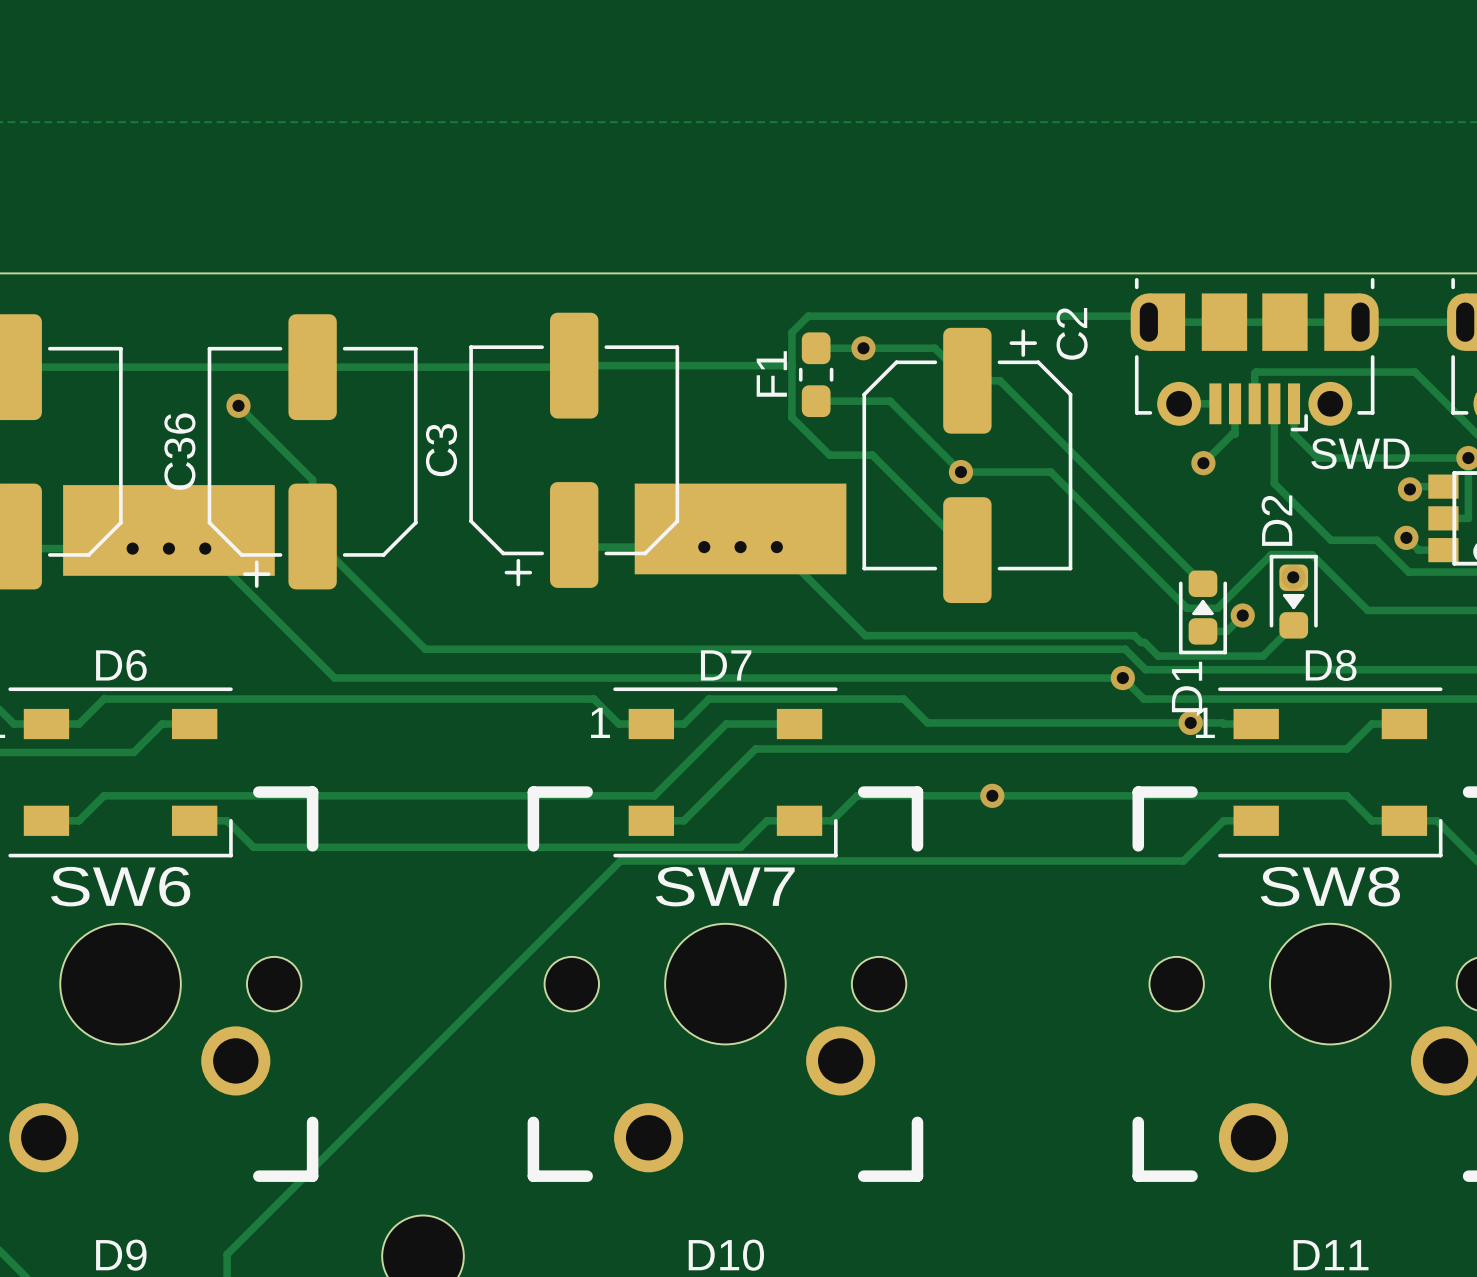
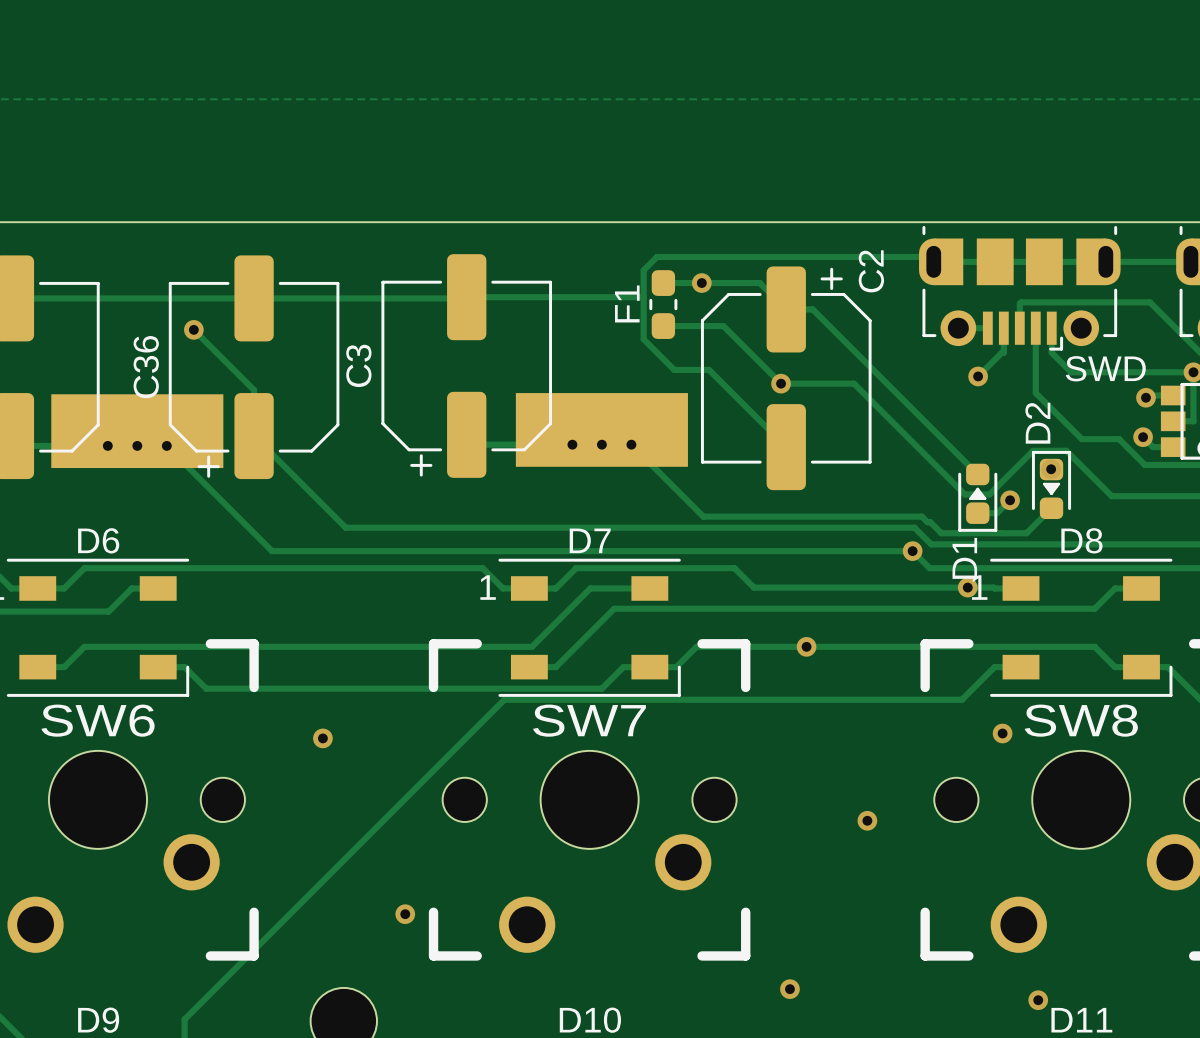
via: none -> (1002, 733)
via: none -> (322, 738)
via: none -> (867, 820)
via: none -> (405, 914)
via: none -> (789, 989)
via: none -> (1038, 1000)

